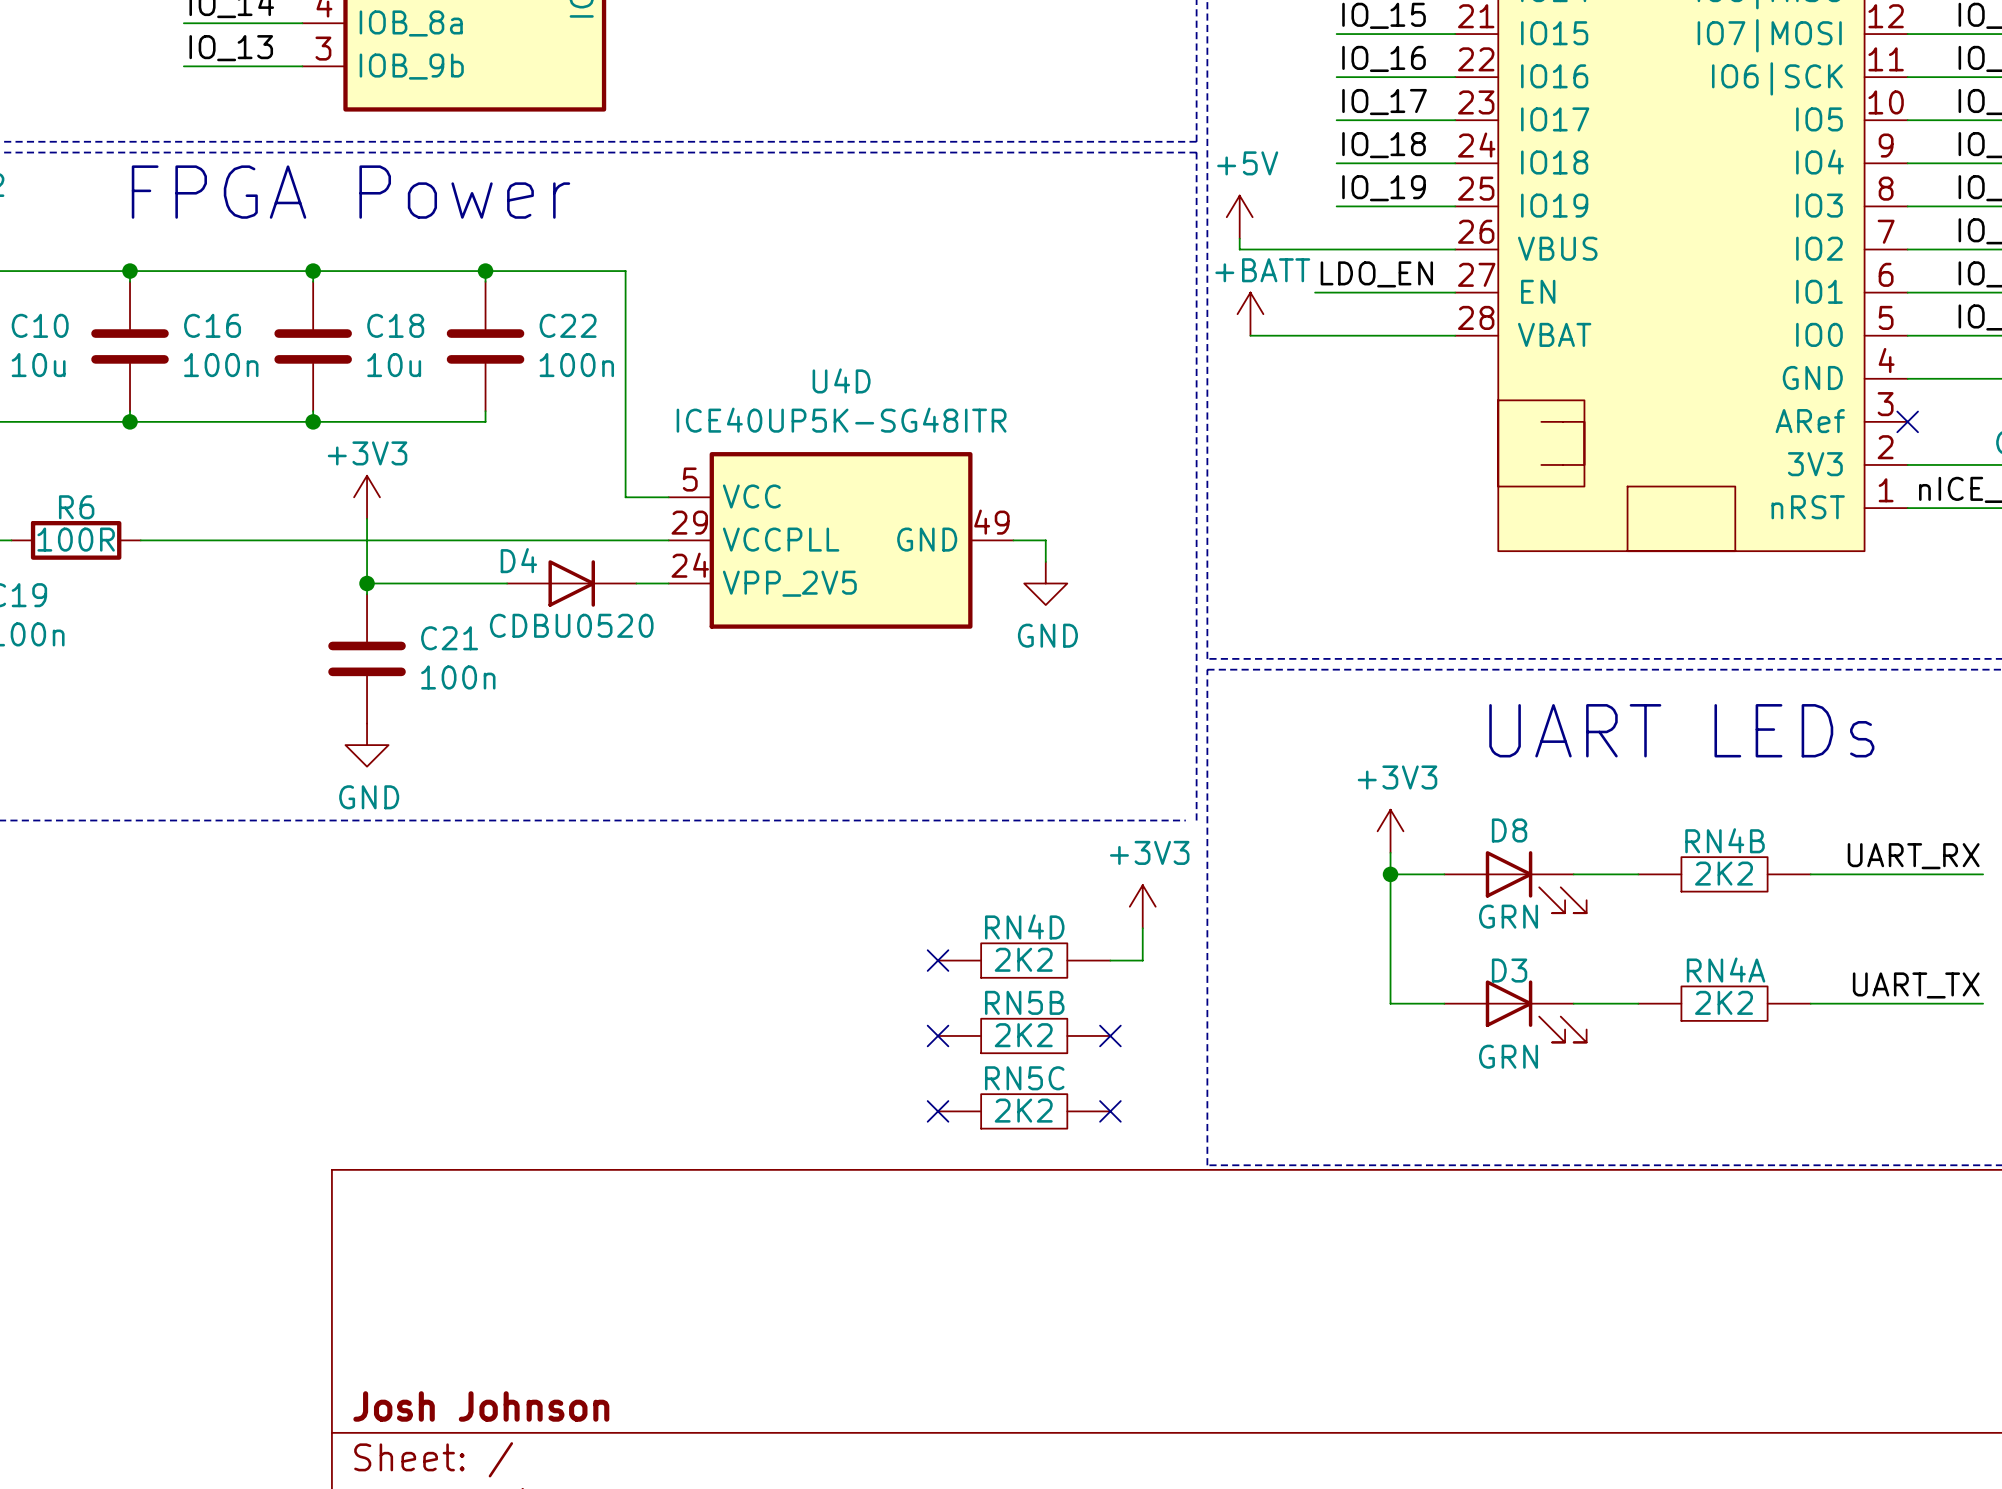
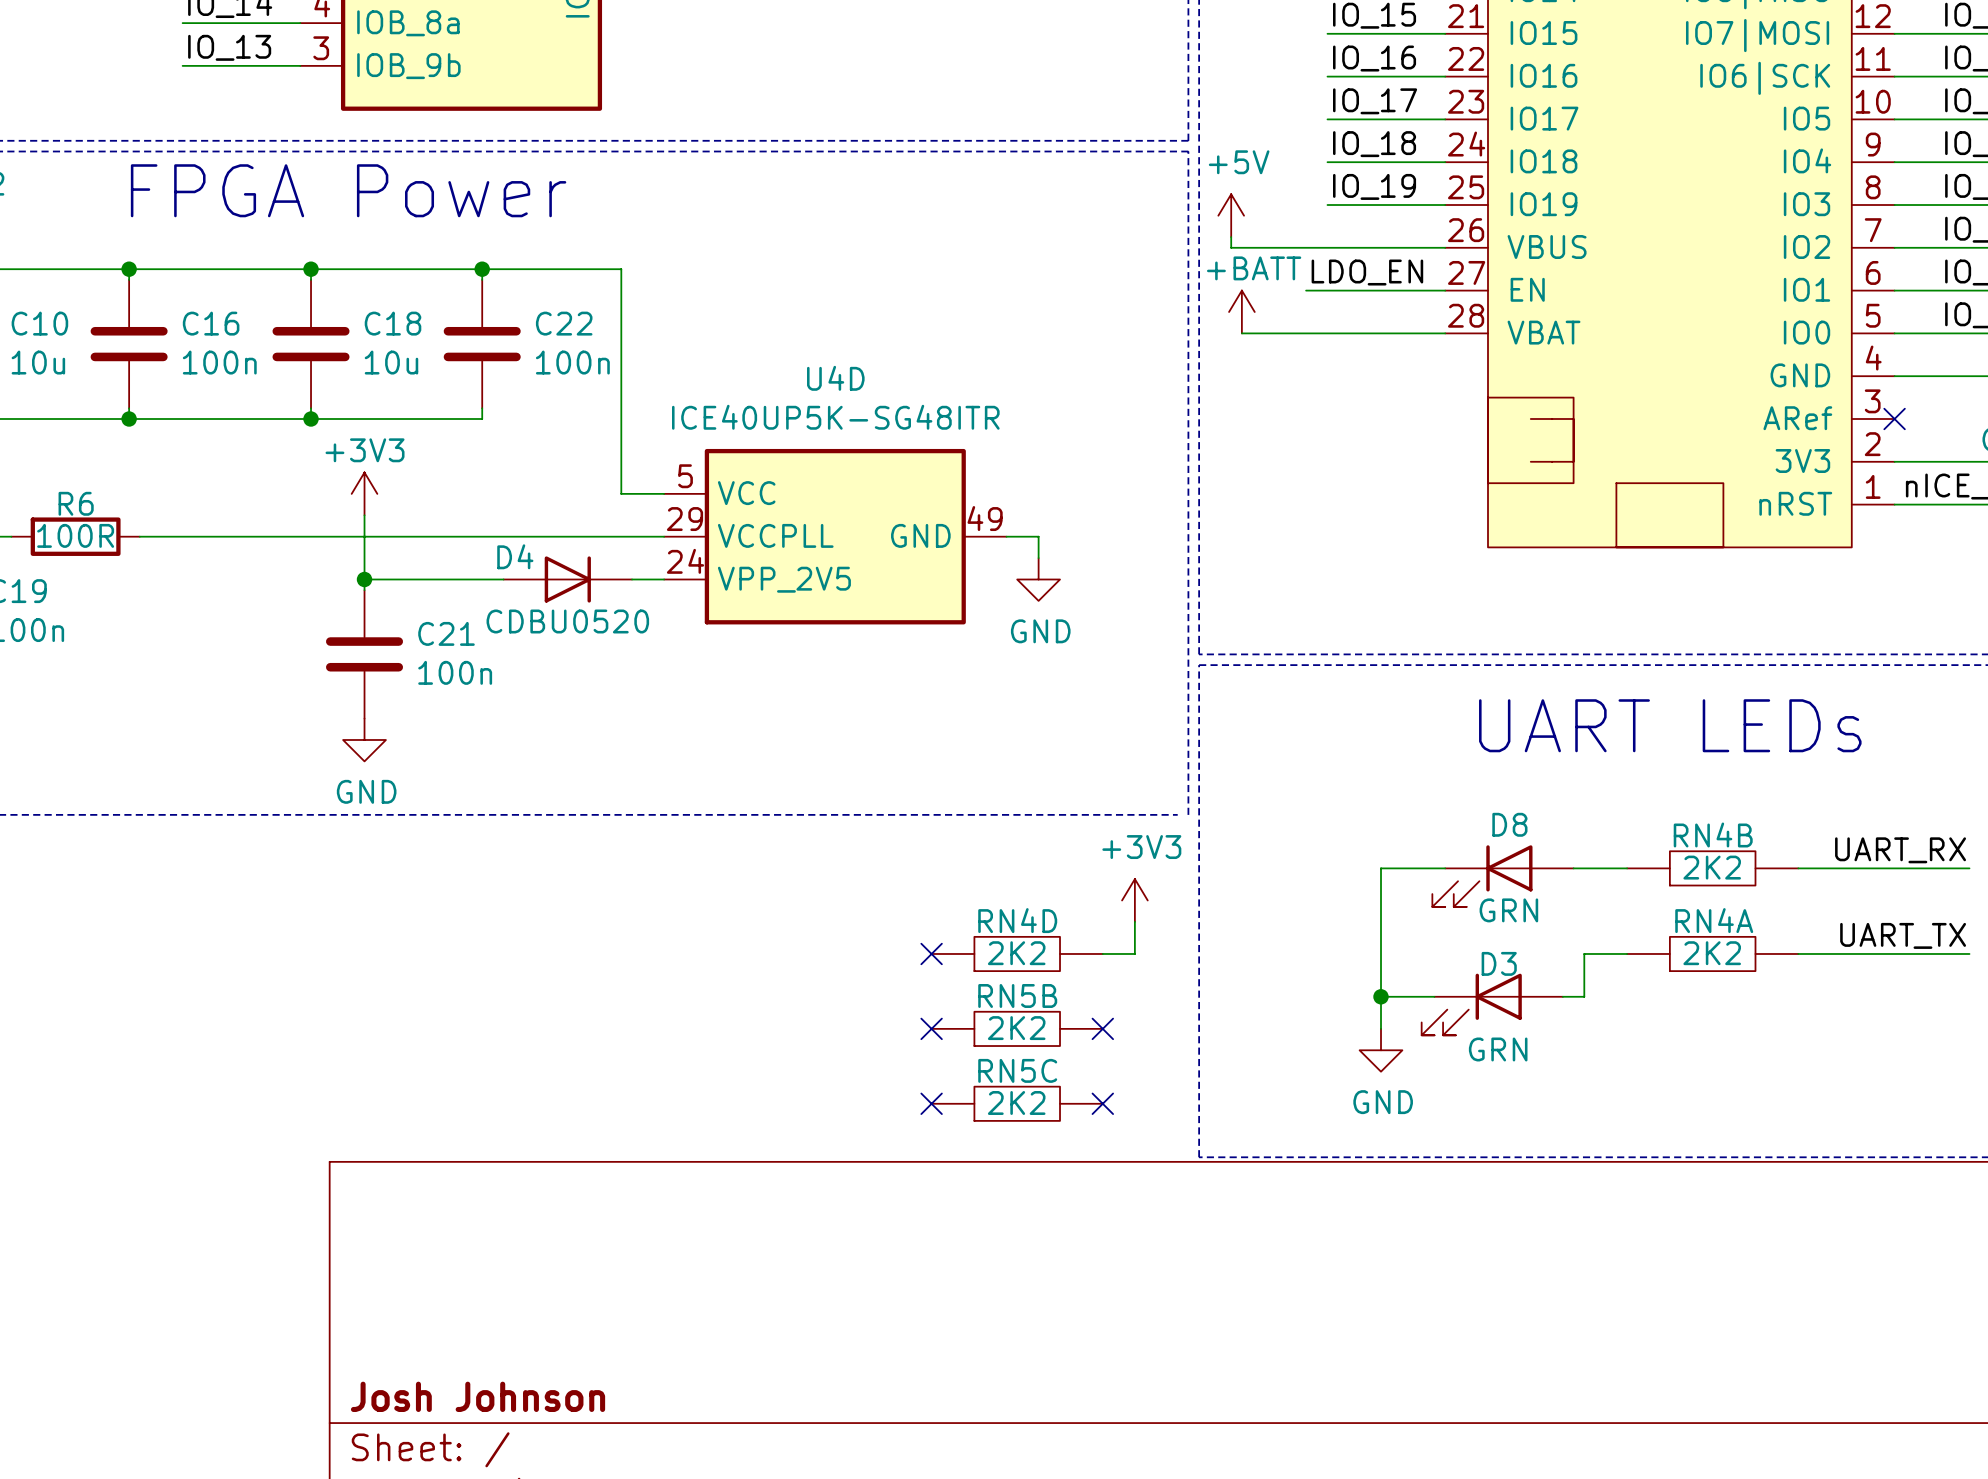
power symbol: +3V3 (1390, 831) -> none
wire: (1390, 852) (1390, 874) -> none
junction: (1390, 874) -> none
D8 flip: as is (1536, 882) -> left-right (1482, 876)
label position: UART_TX (1916, 985) -> UART_TX (1903, 935)
wire: none -> (1381, 996) (1381, 1028)
junction: none -> (1381, 996)
wire: (1595, 1003) (1638, 1003) -> (1584, 996) (1584, 953) (1627, 953)
RN4A position: (1724, 1003) -> (1712, 953)
wire: (1810, 1003) (1983, 1003) -> (1798, 953) (1969, 953)
D3 flip: as is (1536, 1011) -> left-right (1471, 1004)
power symbol: none -> GND (1381, 1050)

